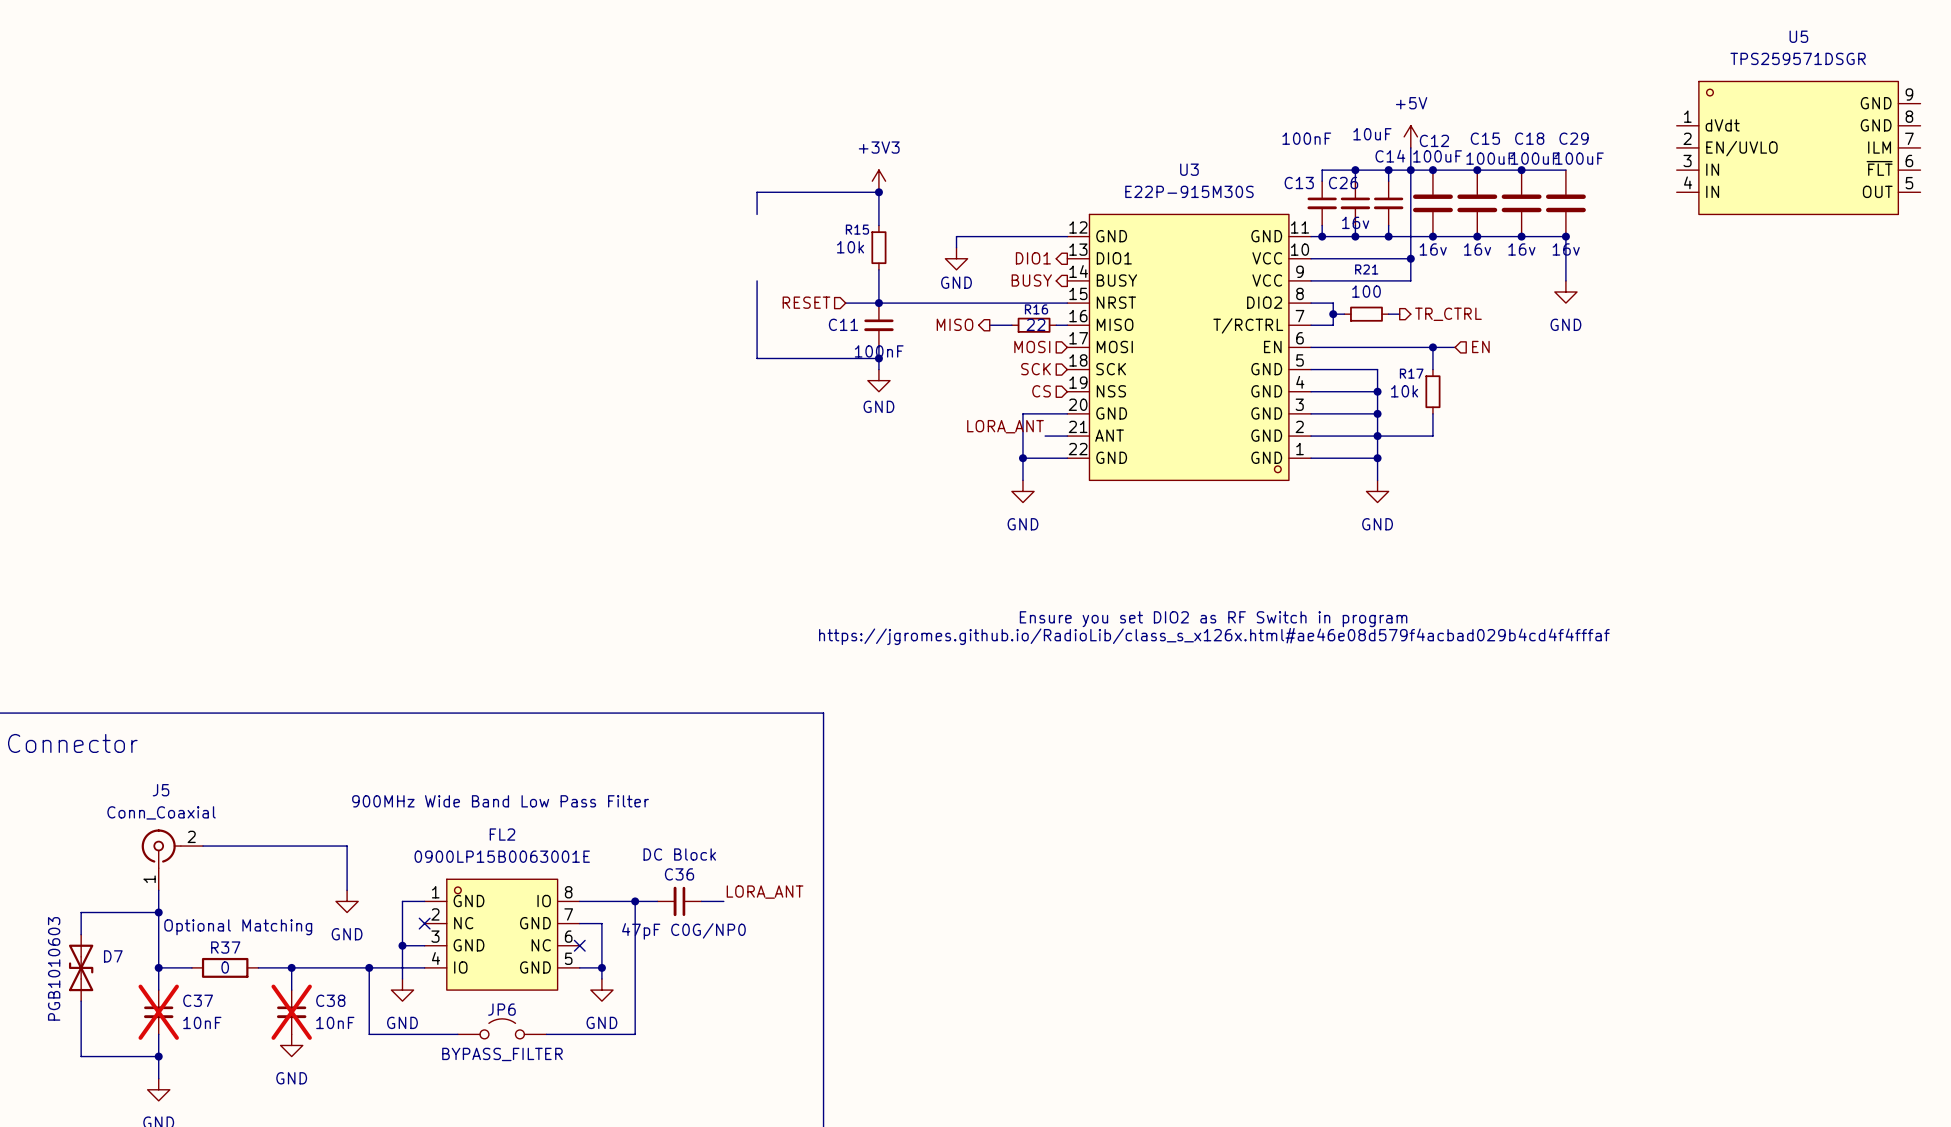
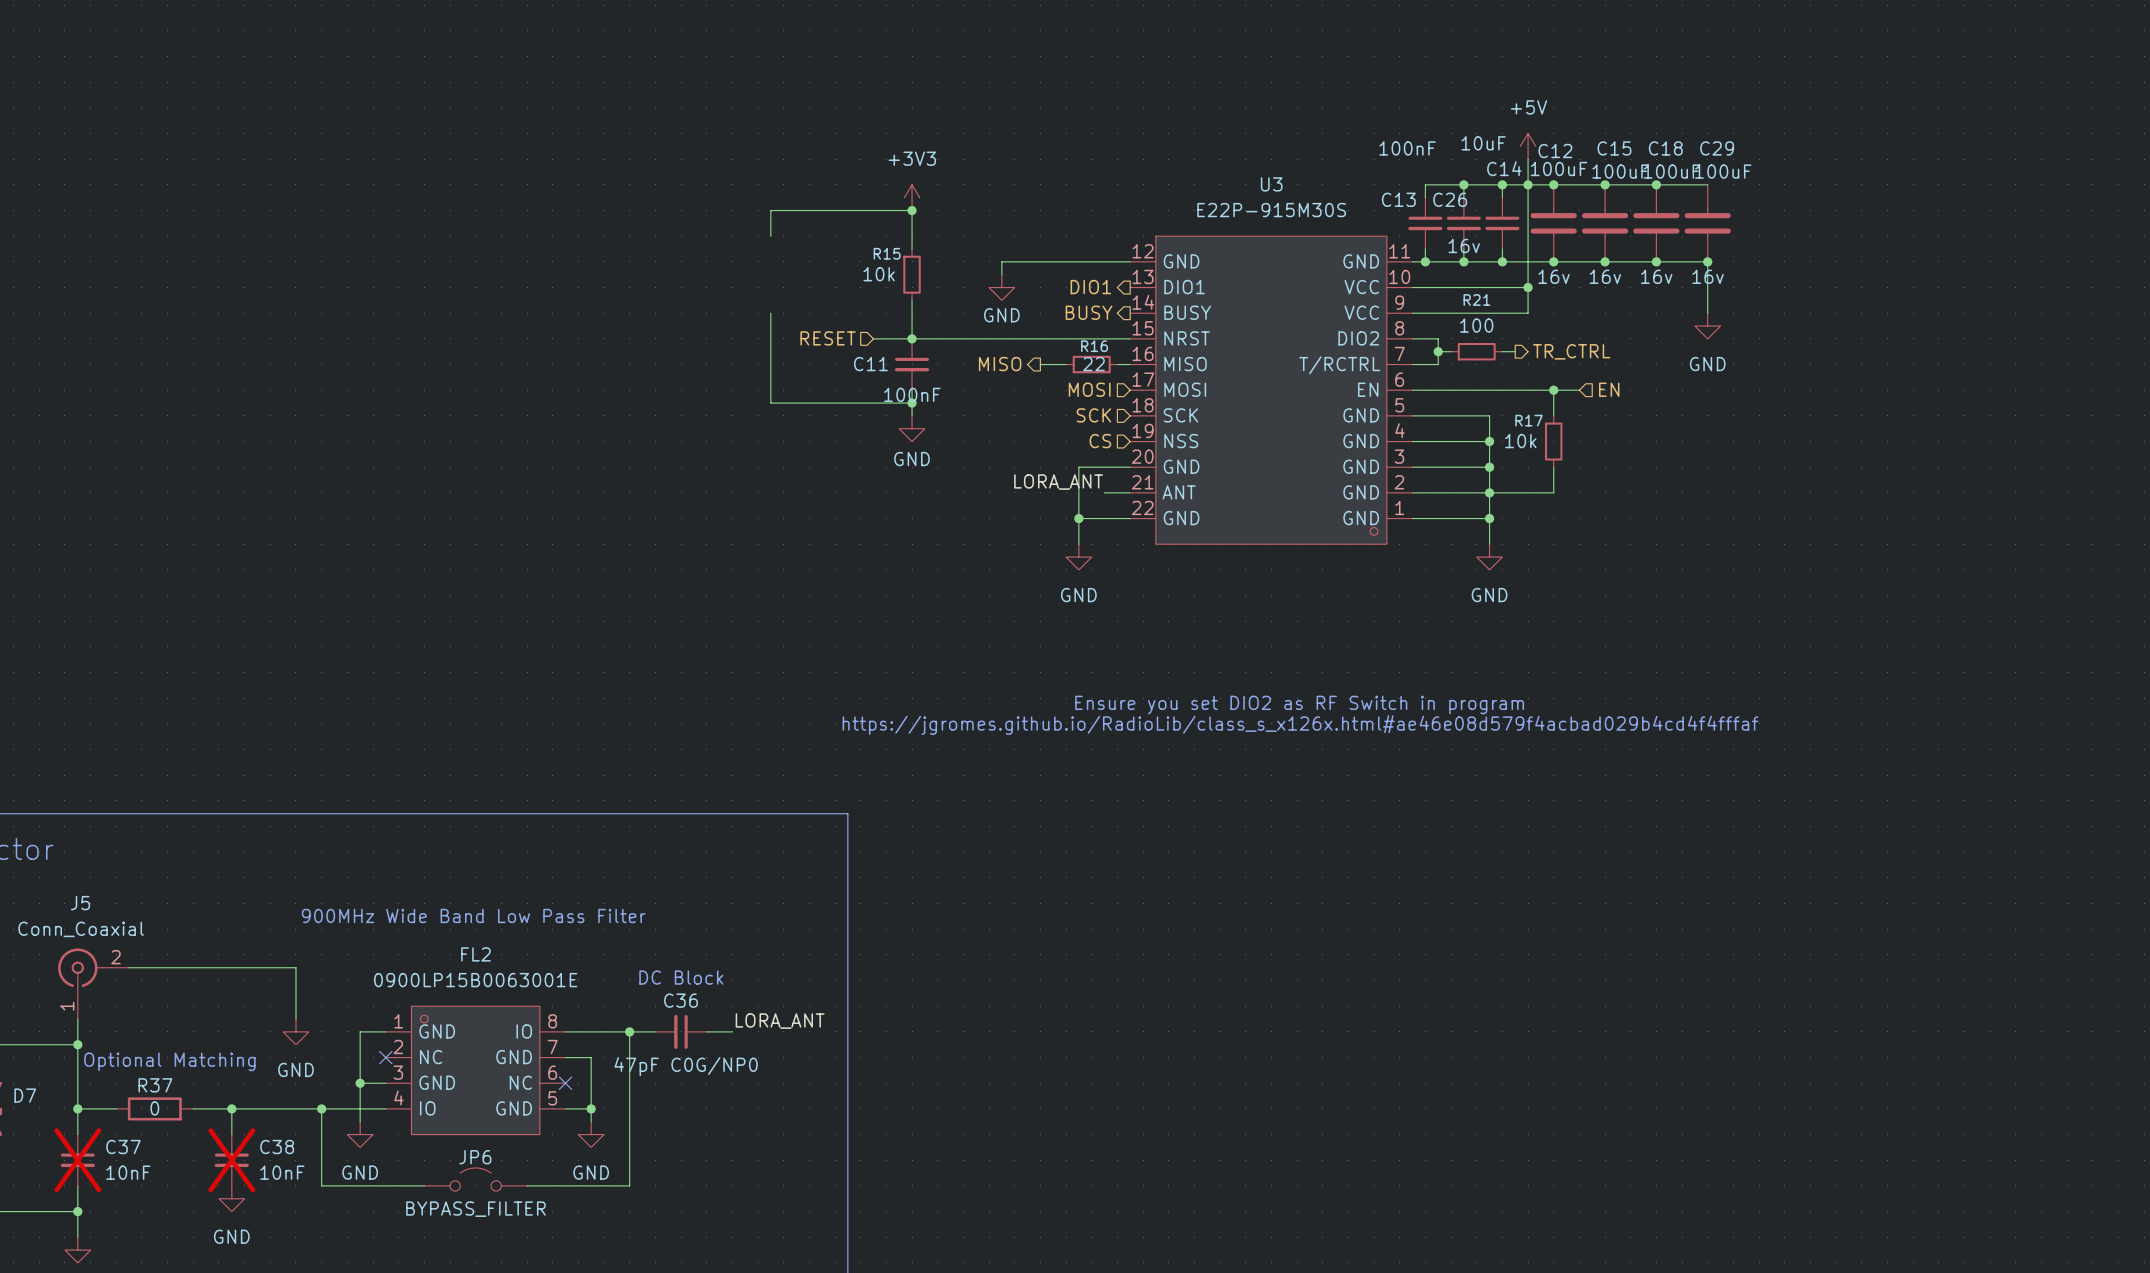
U5: TPS259571DSGR (1798, 147) -> none

